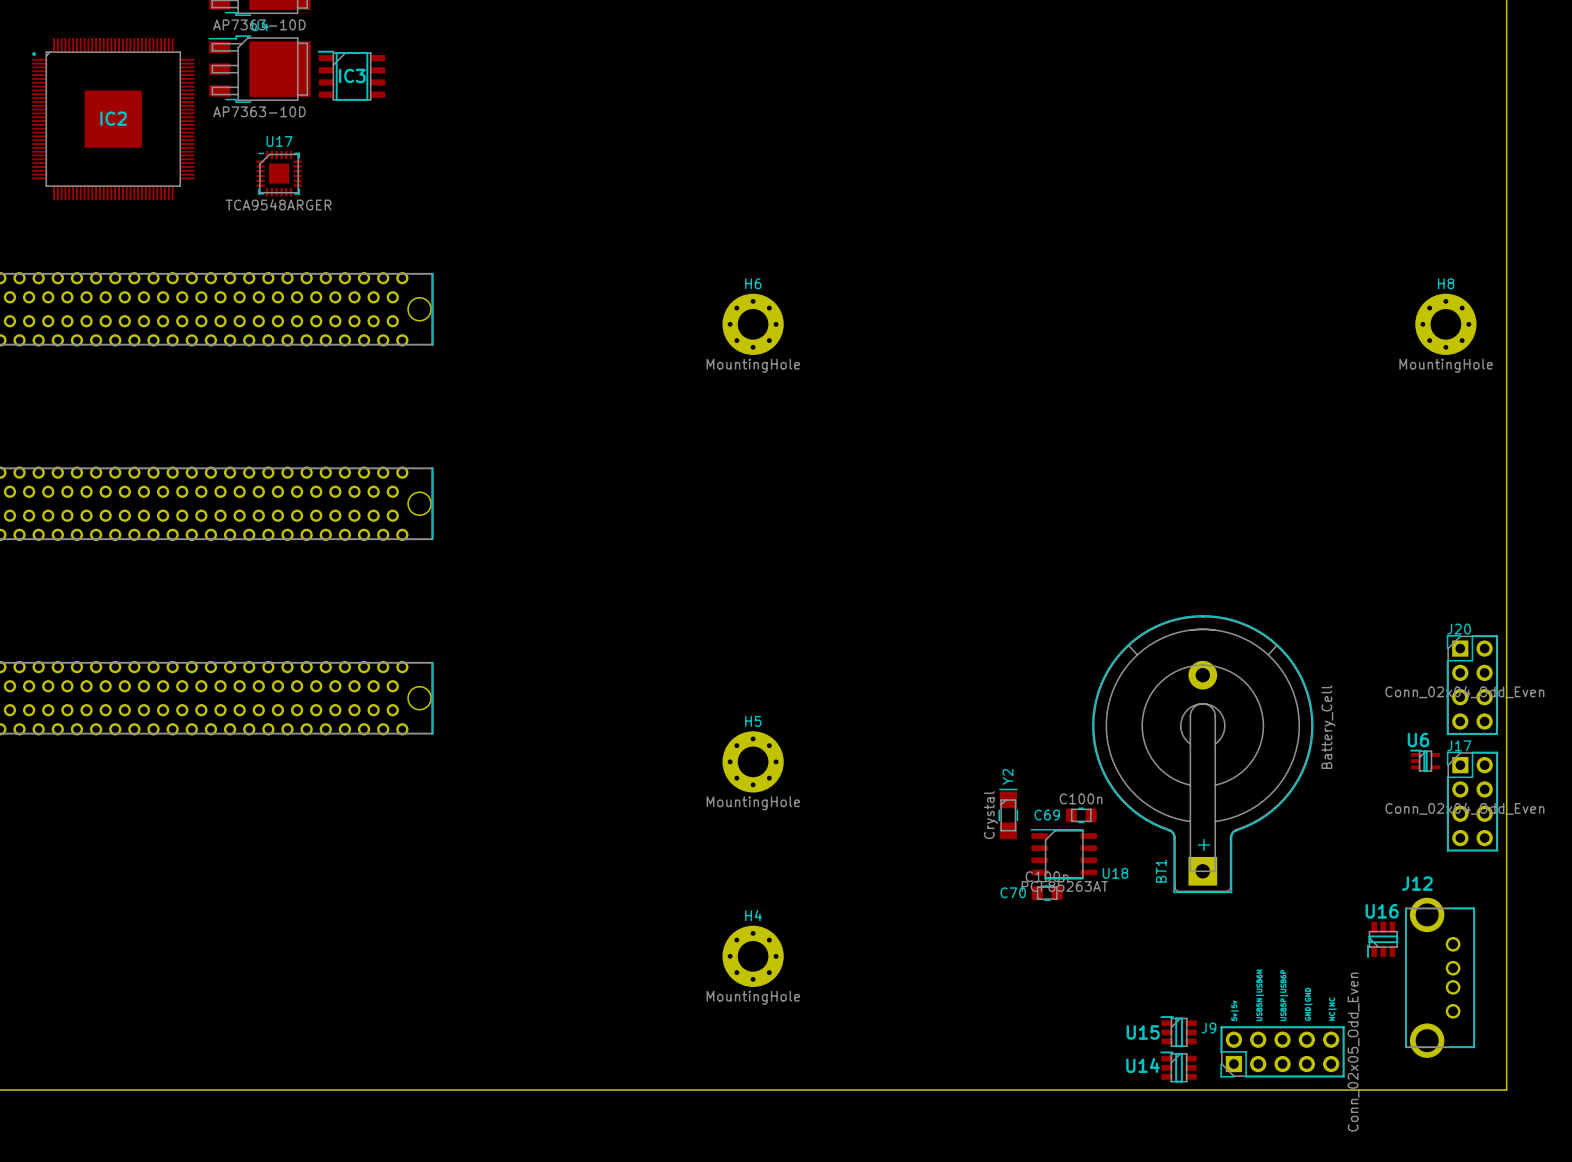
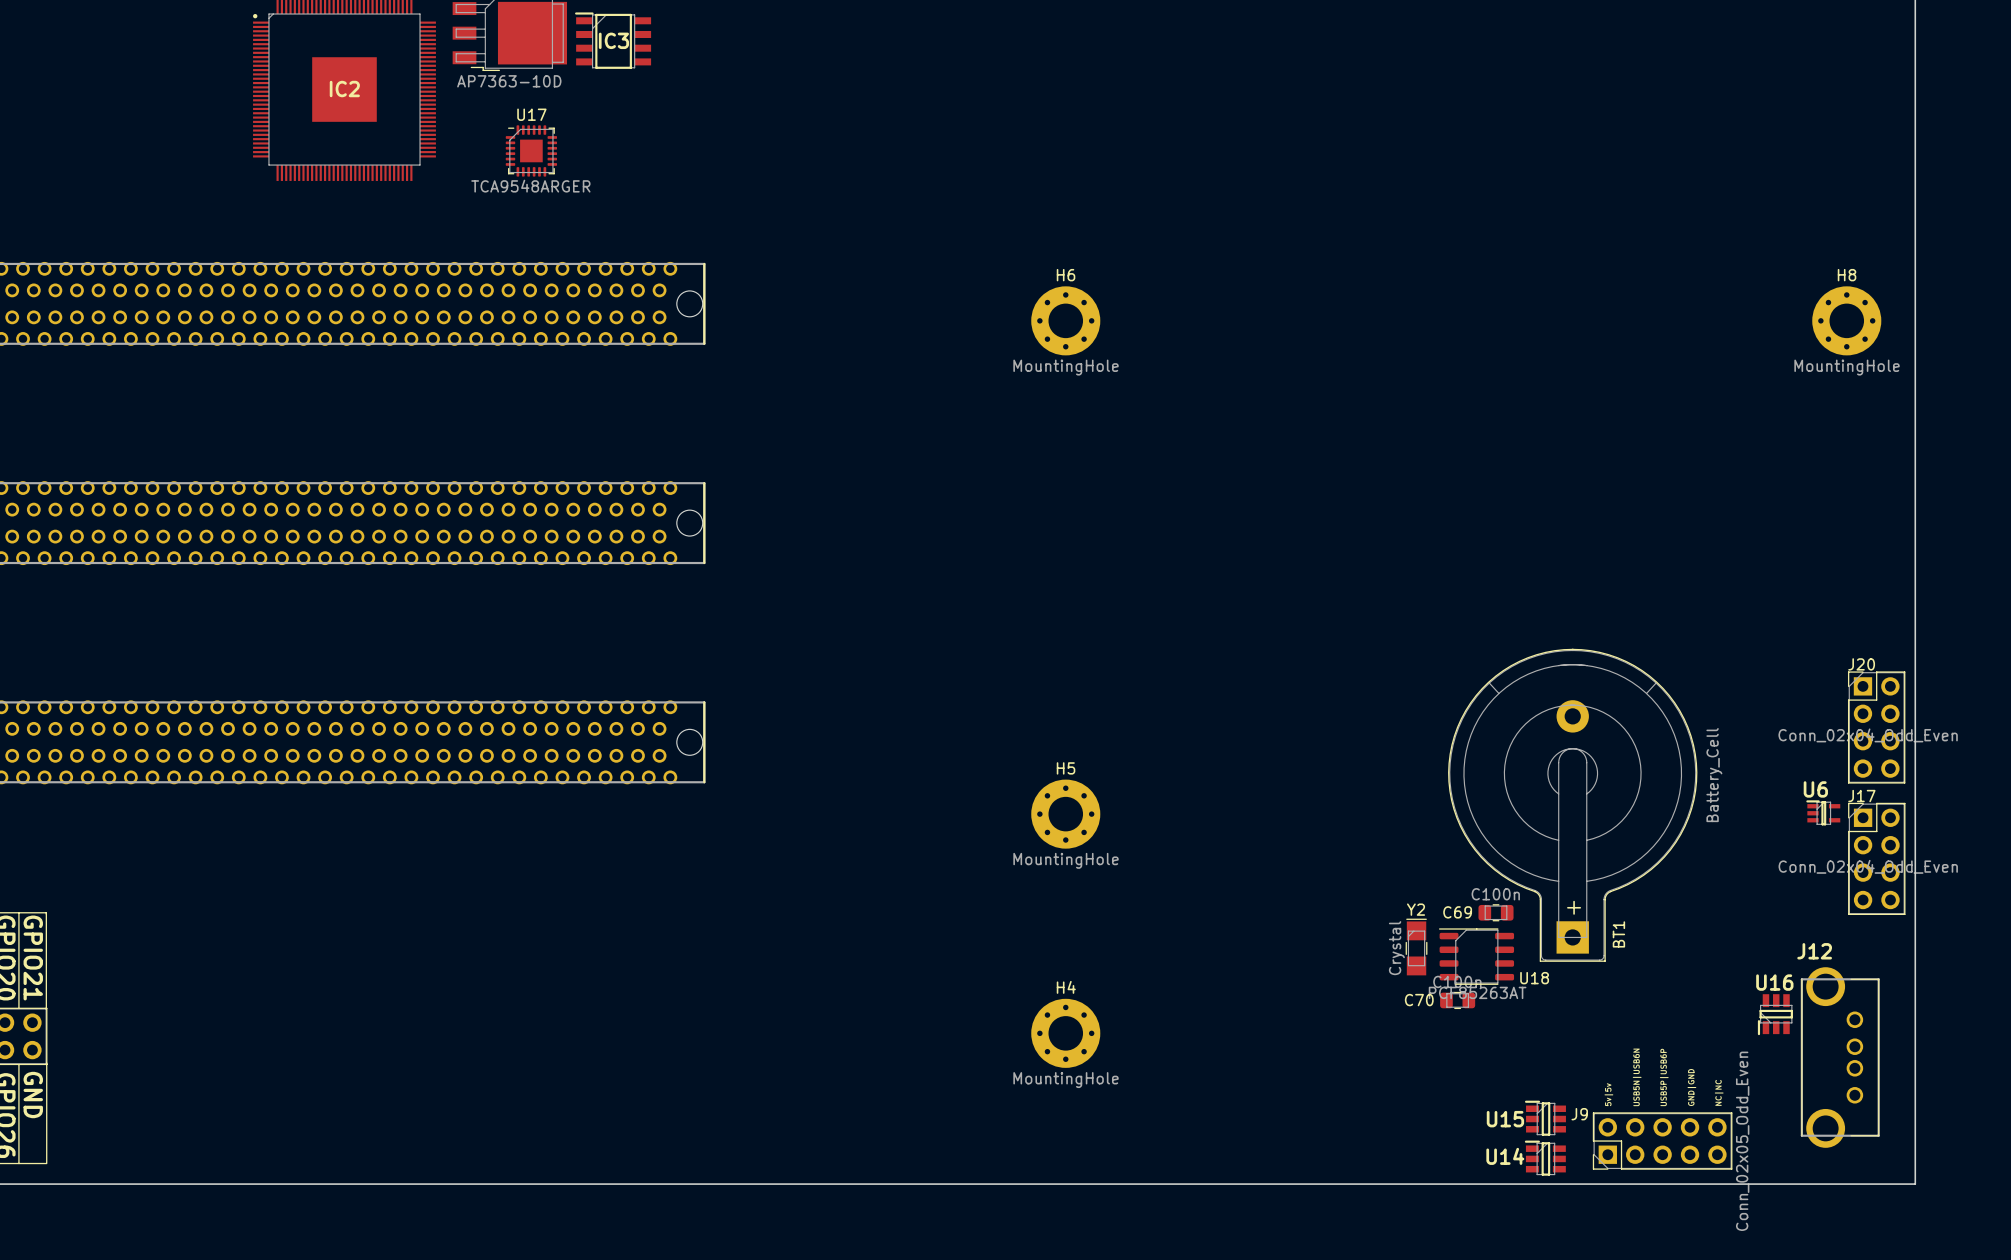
Y2 name rotation: 0° (1007, 776) -> 90° clockwise (1416, 909)
Y2 position: (1008, 814) -> (1416, 947)
C69 position: (1081, 815) -> (1496, 912)
U18 position: (1063, 854) -> (1476, 956)
BT1 name position: BT1 (1161, 871) -> BT1 (1618, 934)
C70 position: (1047, 893) -> (1457, 1000)

